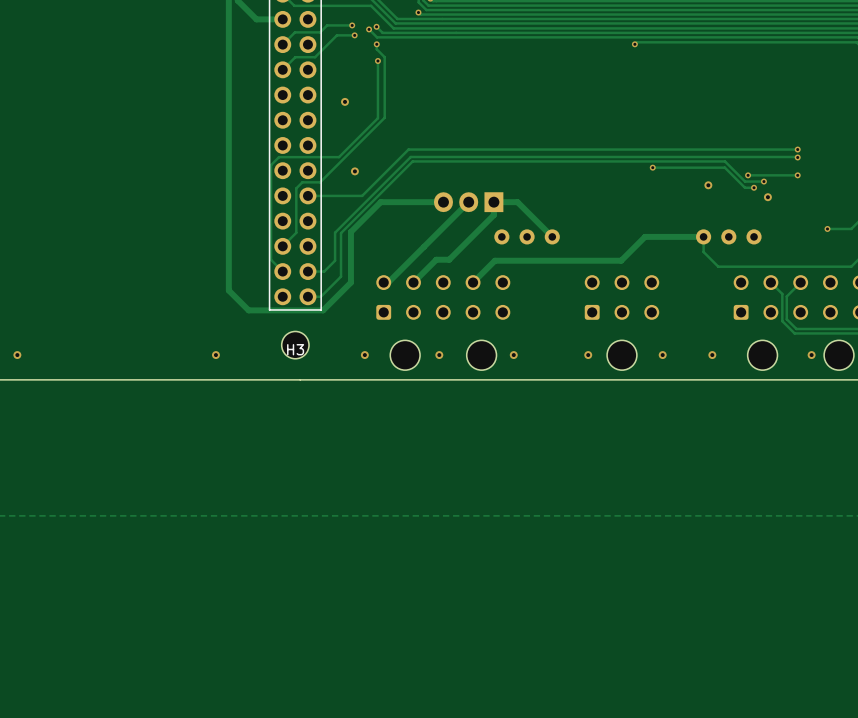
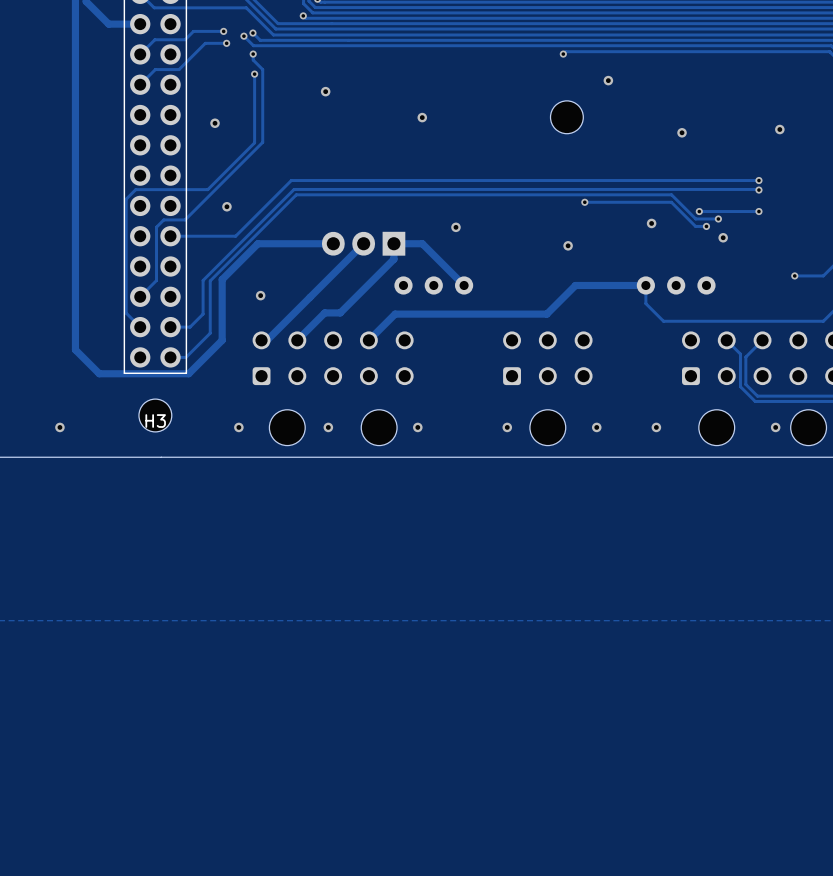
via: none -> (608, 80)
via: none -> (325, 91)
part: none -> (566, 117)
via: none -> (422, 117)
via: none -> (779, 129)
via: none -> (682, 132)
via: none -> (455, 227)
via: none -> (568, 245)
via: none -> (260, 295)

